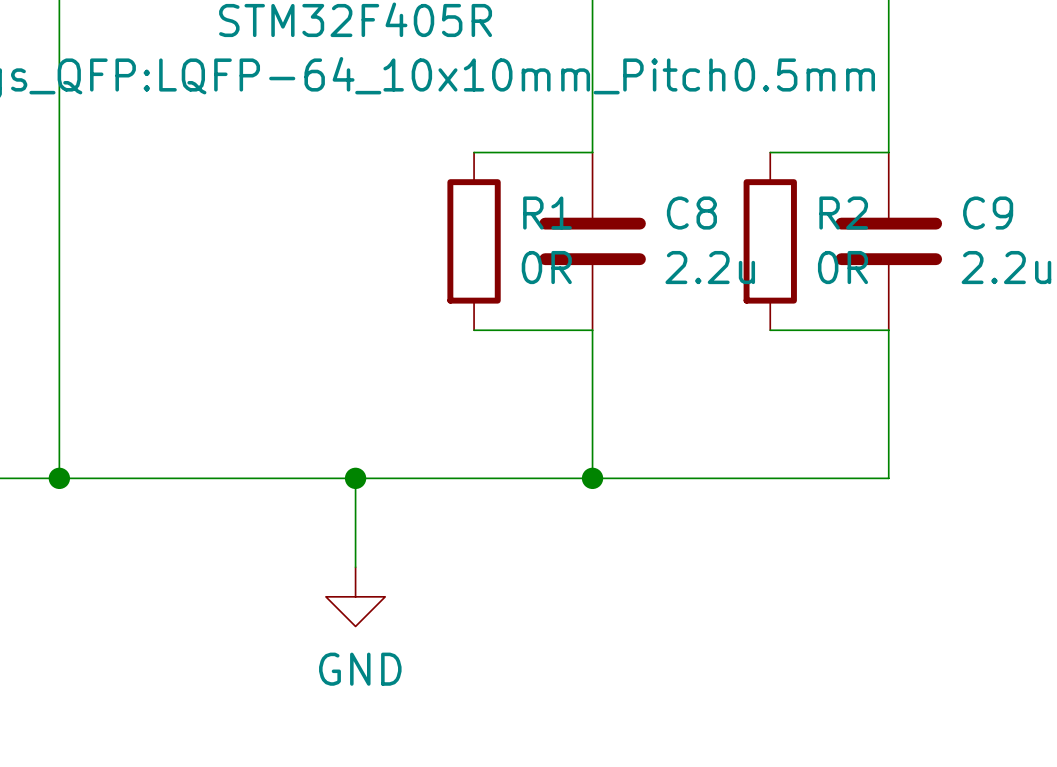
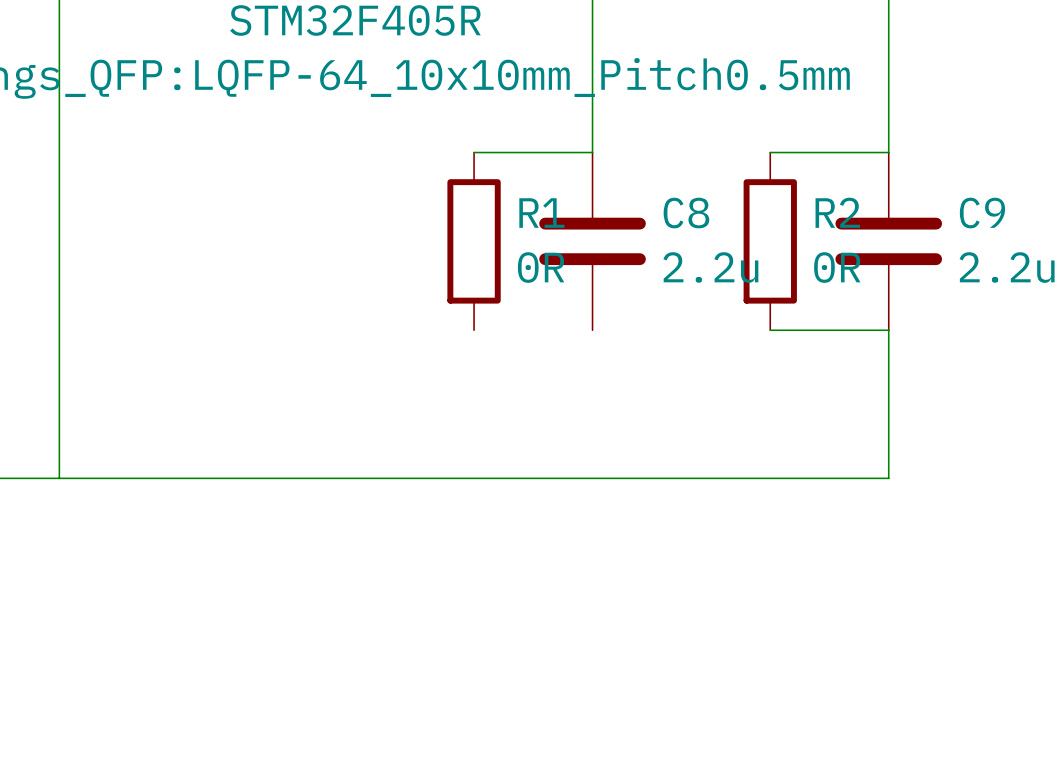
wire: (474, 330) (592, 330) (592, 478) -> none
junction: (59, 478) -> none
wire: (355, 478) (355, 567) -> none
junction: (355, 478) -> none
junction: (592, 478) -> none
power symbol: GND (355, 596) -> none

